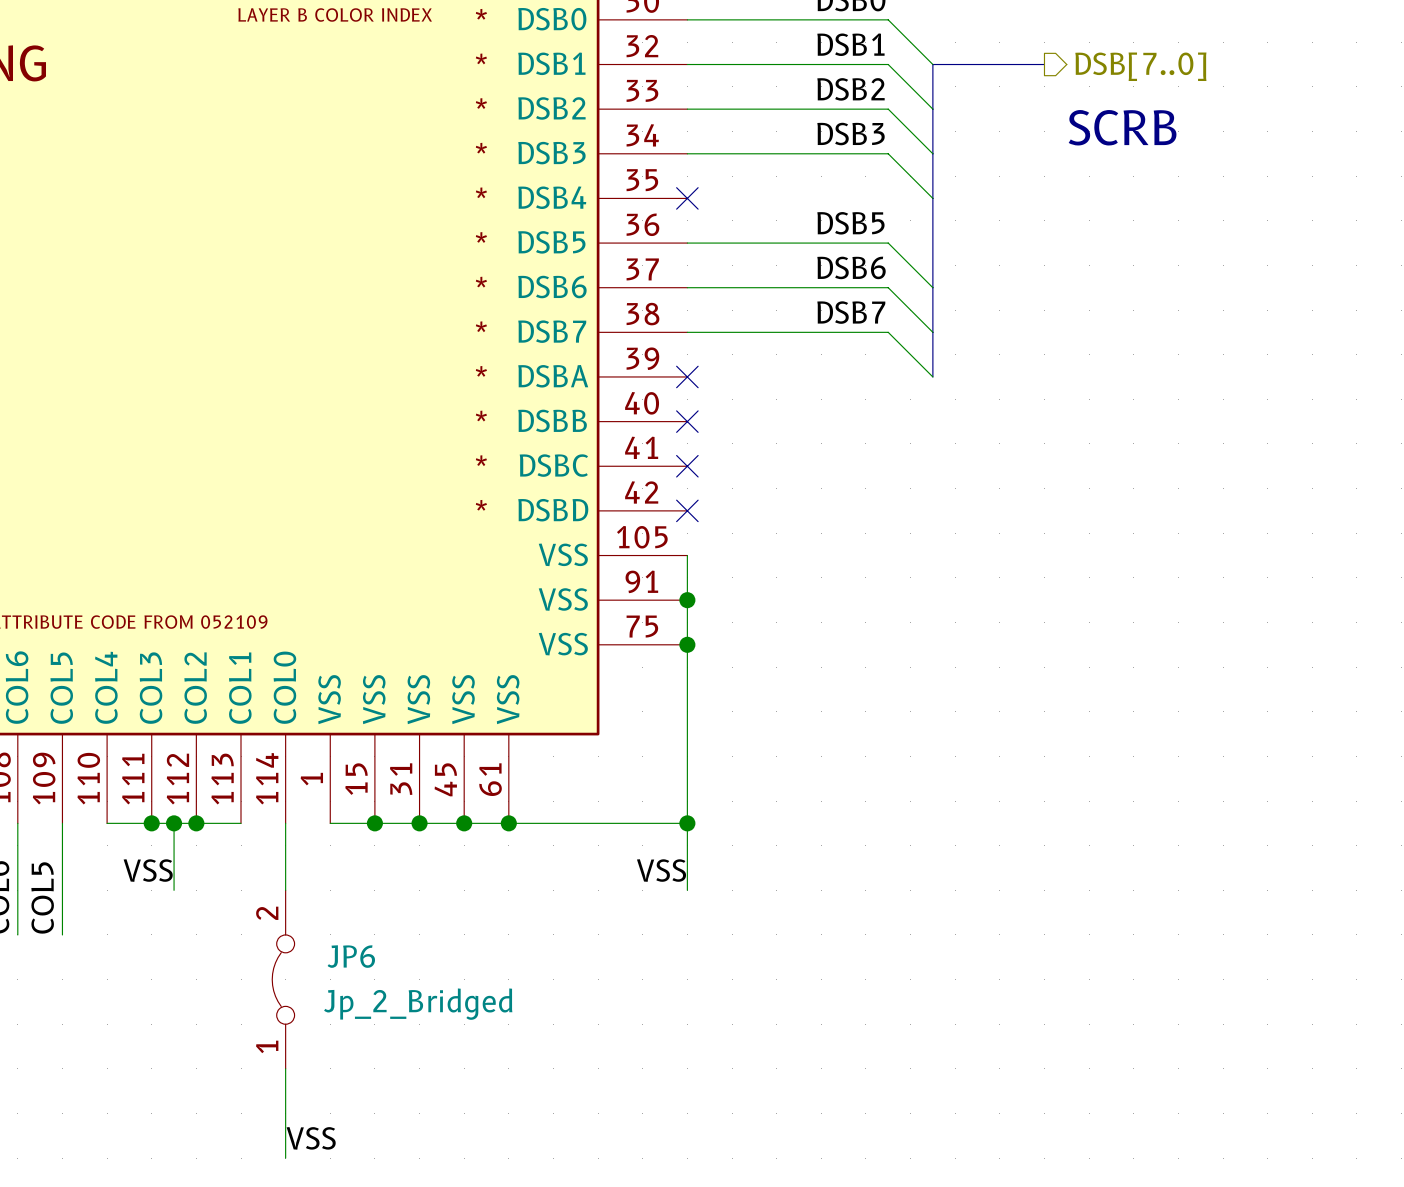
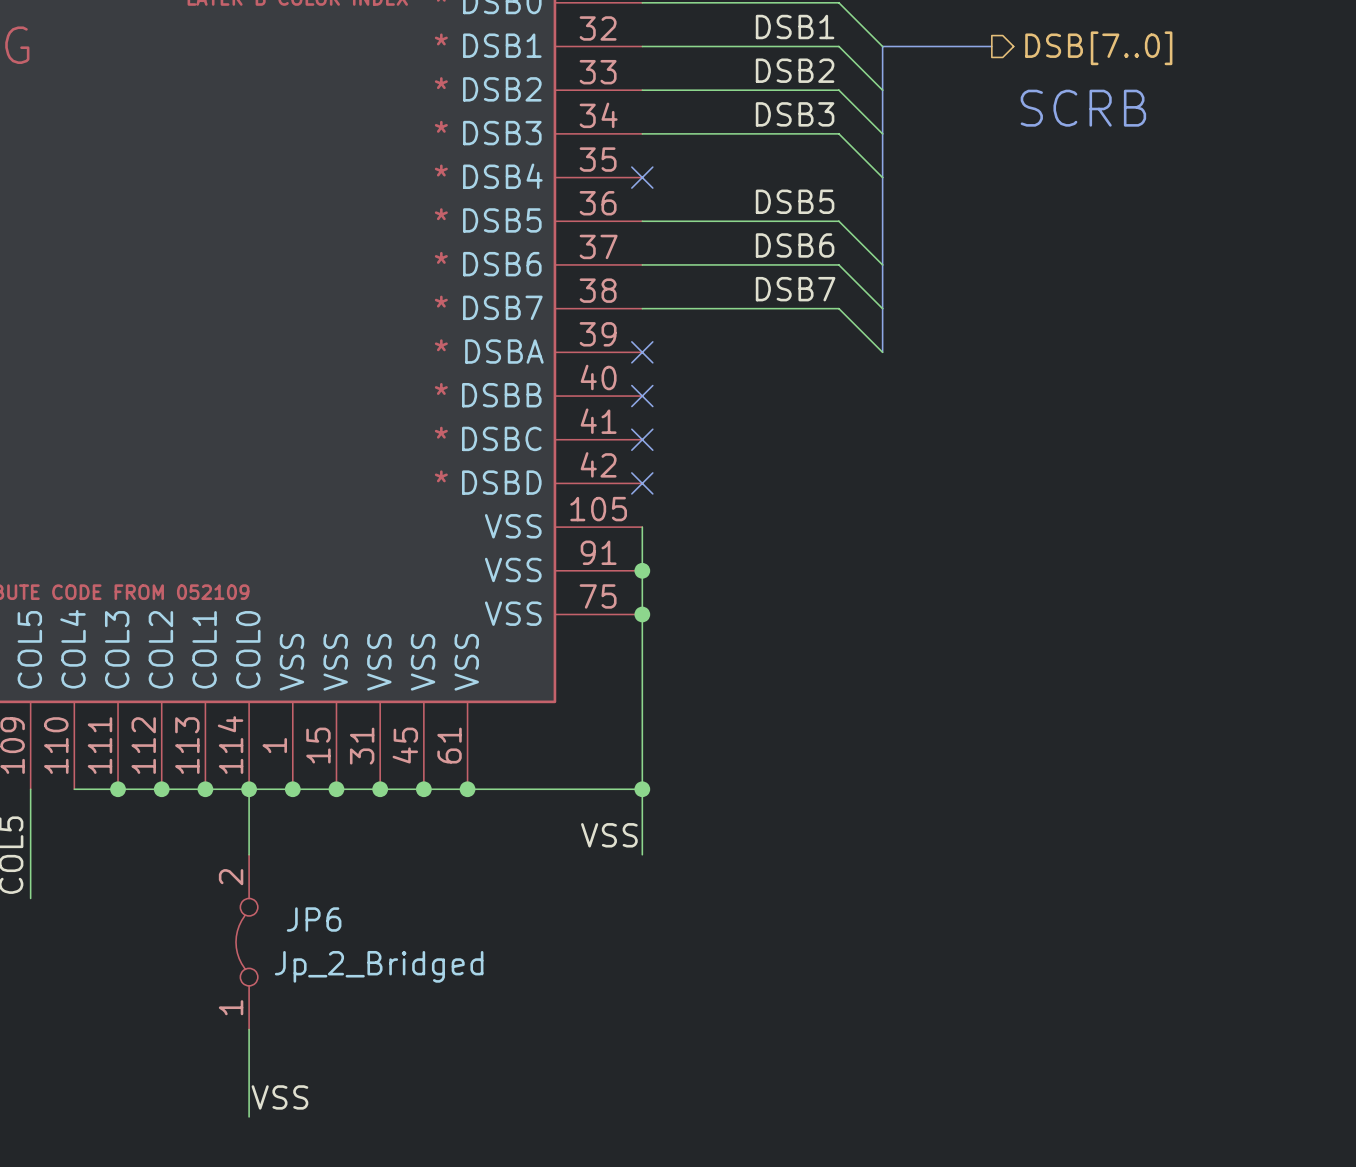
wire: (174, 823) (174, 890) -> none
junction: (174, 823) -> none
wire: none -> (205, 789) (292, 789)
junction: none -> (205, 789)
junction: none -> (249, 789)
junction: none -> (292, 789)
label: VSS (148, 870) -> none

